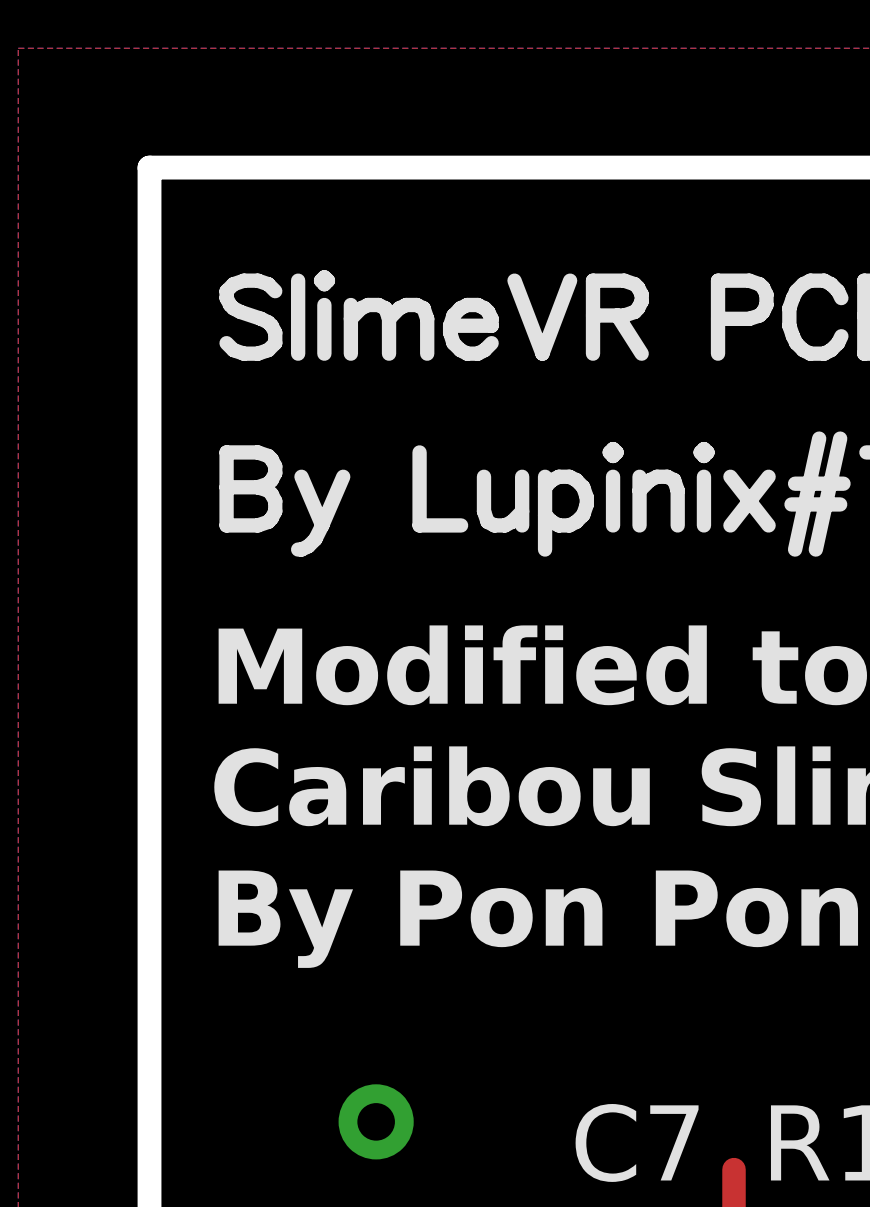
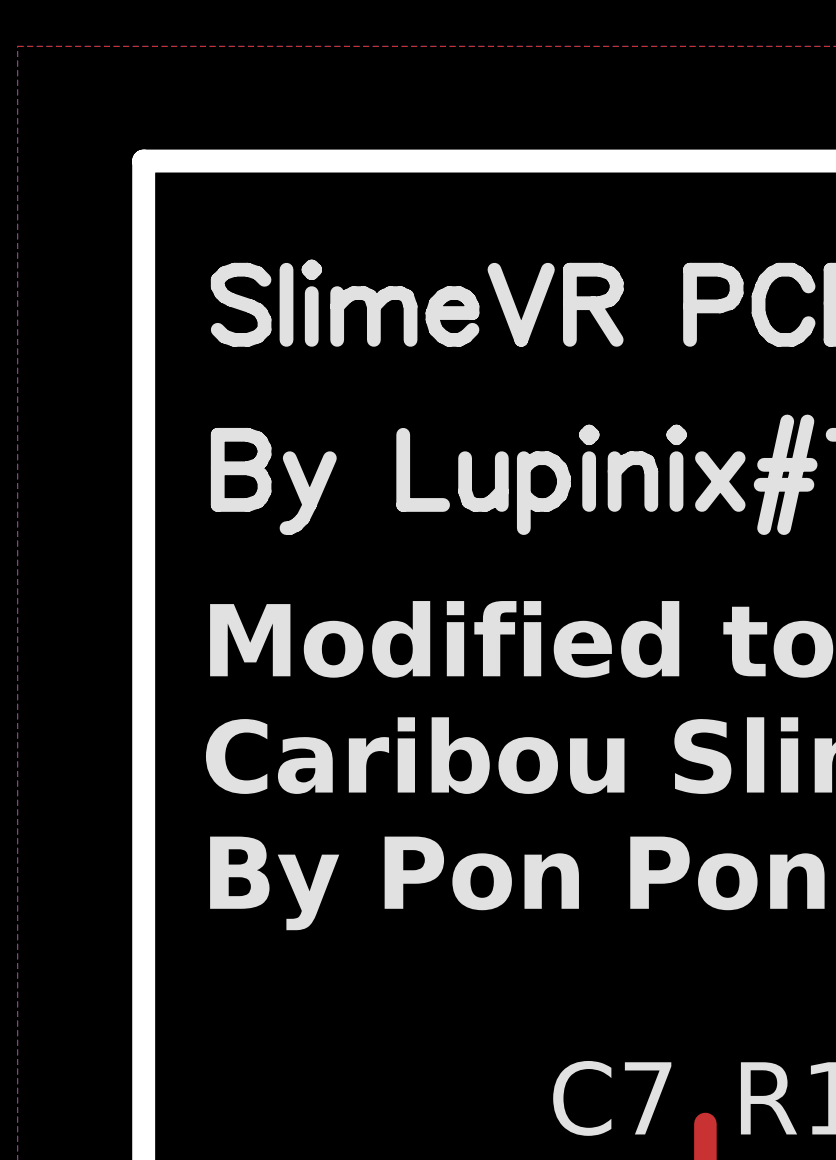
via: (376, 1121) -> none

